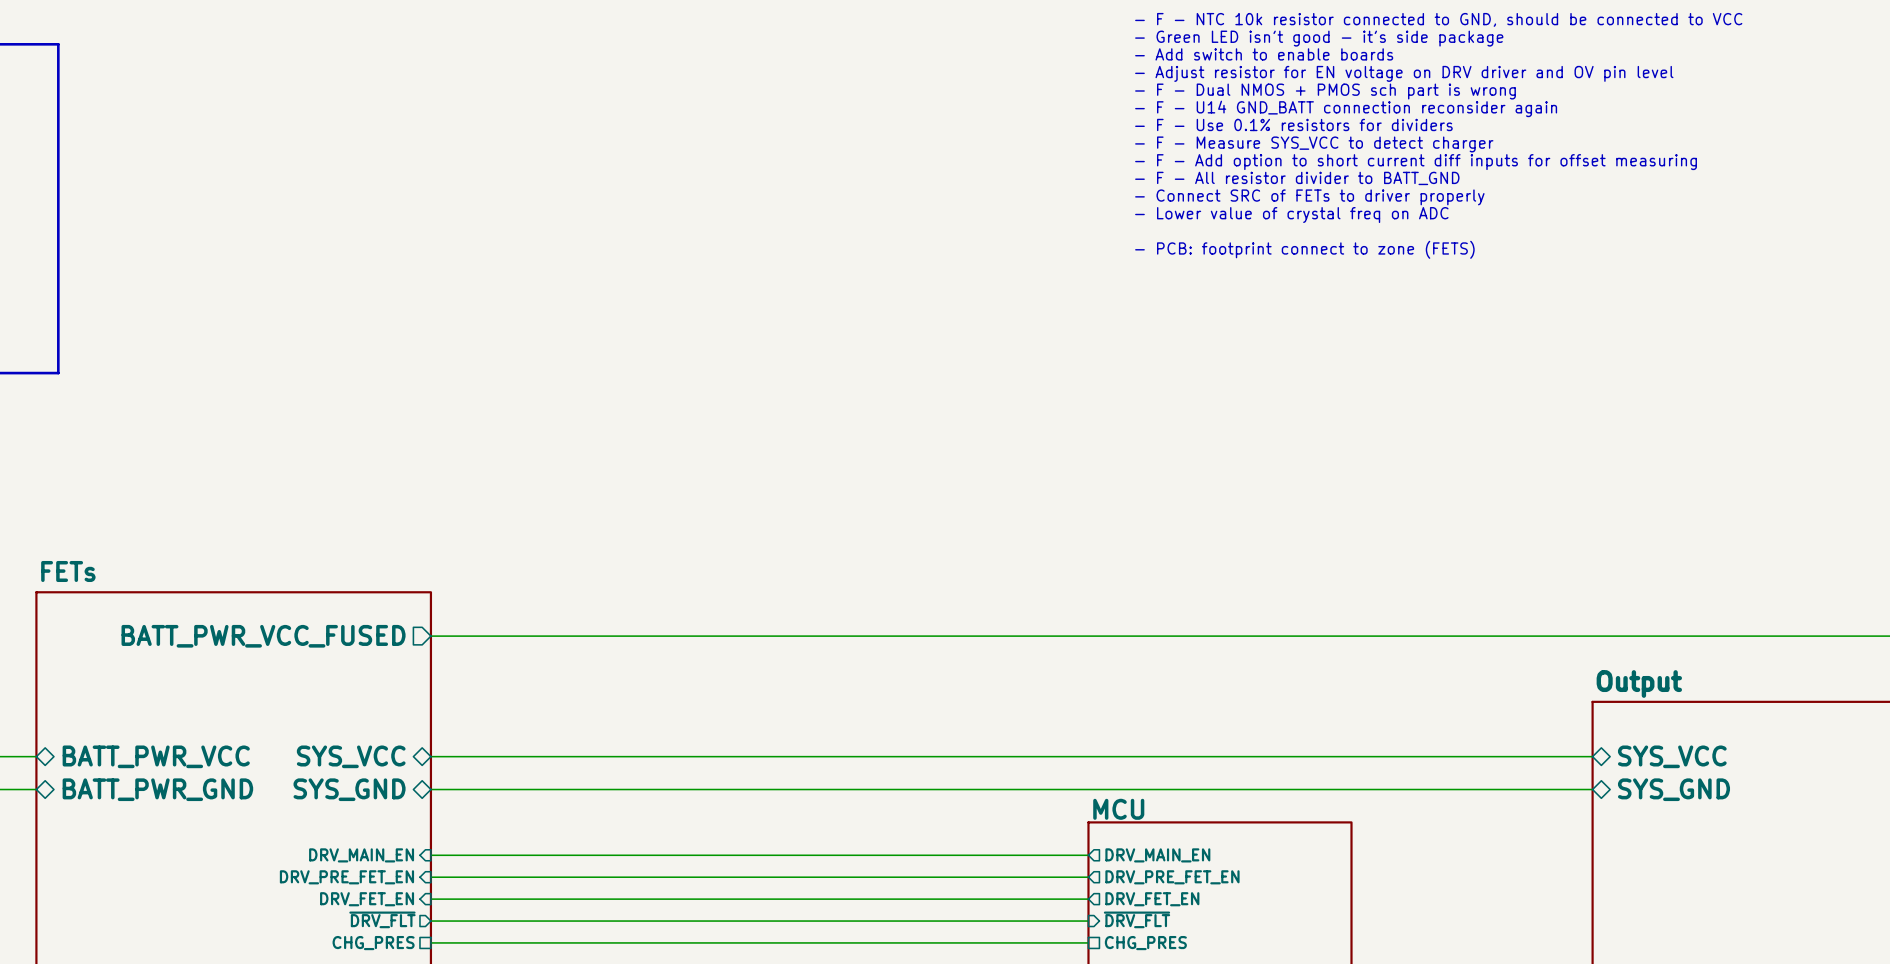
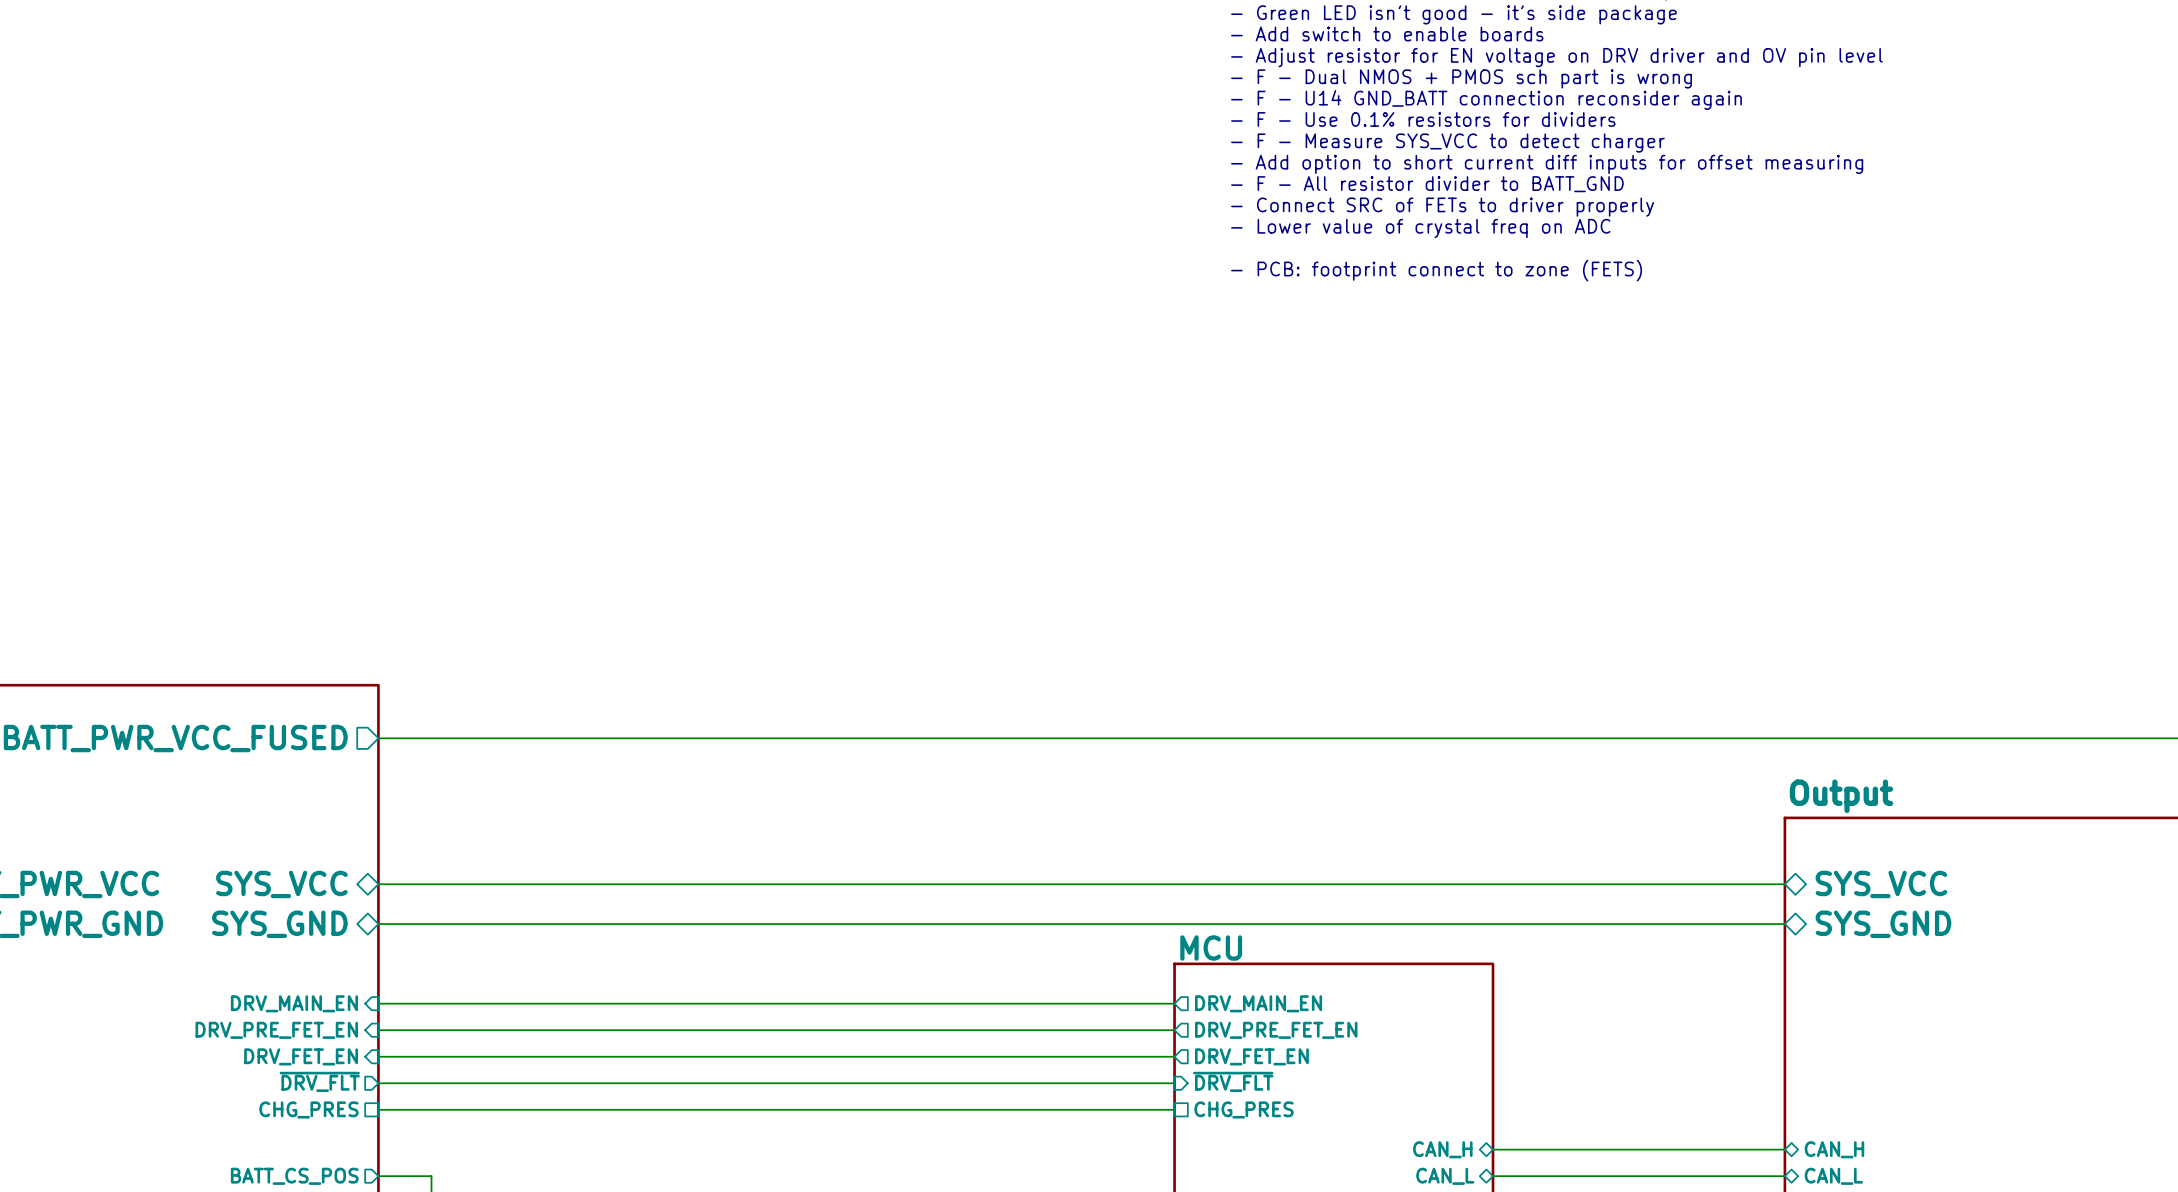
text: - F - Add option to short current diff inputs for offset measuring (1416, 162) -> - Add option to short current diff inputs for offset measuring (1547, 164)

